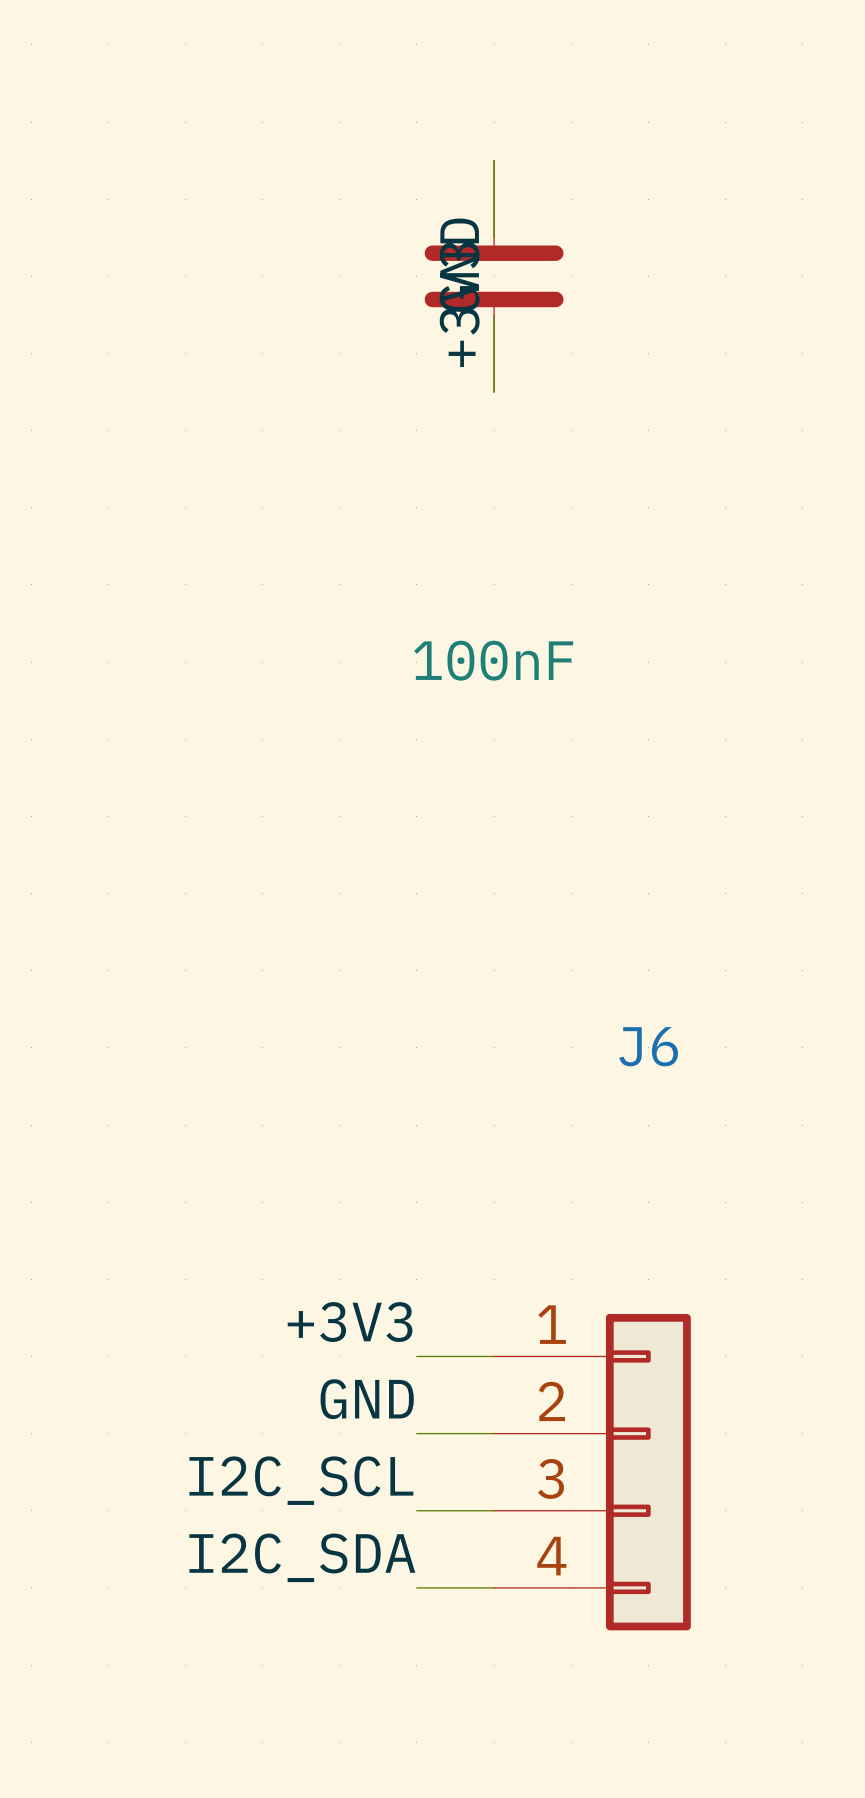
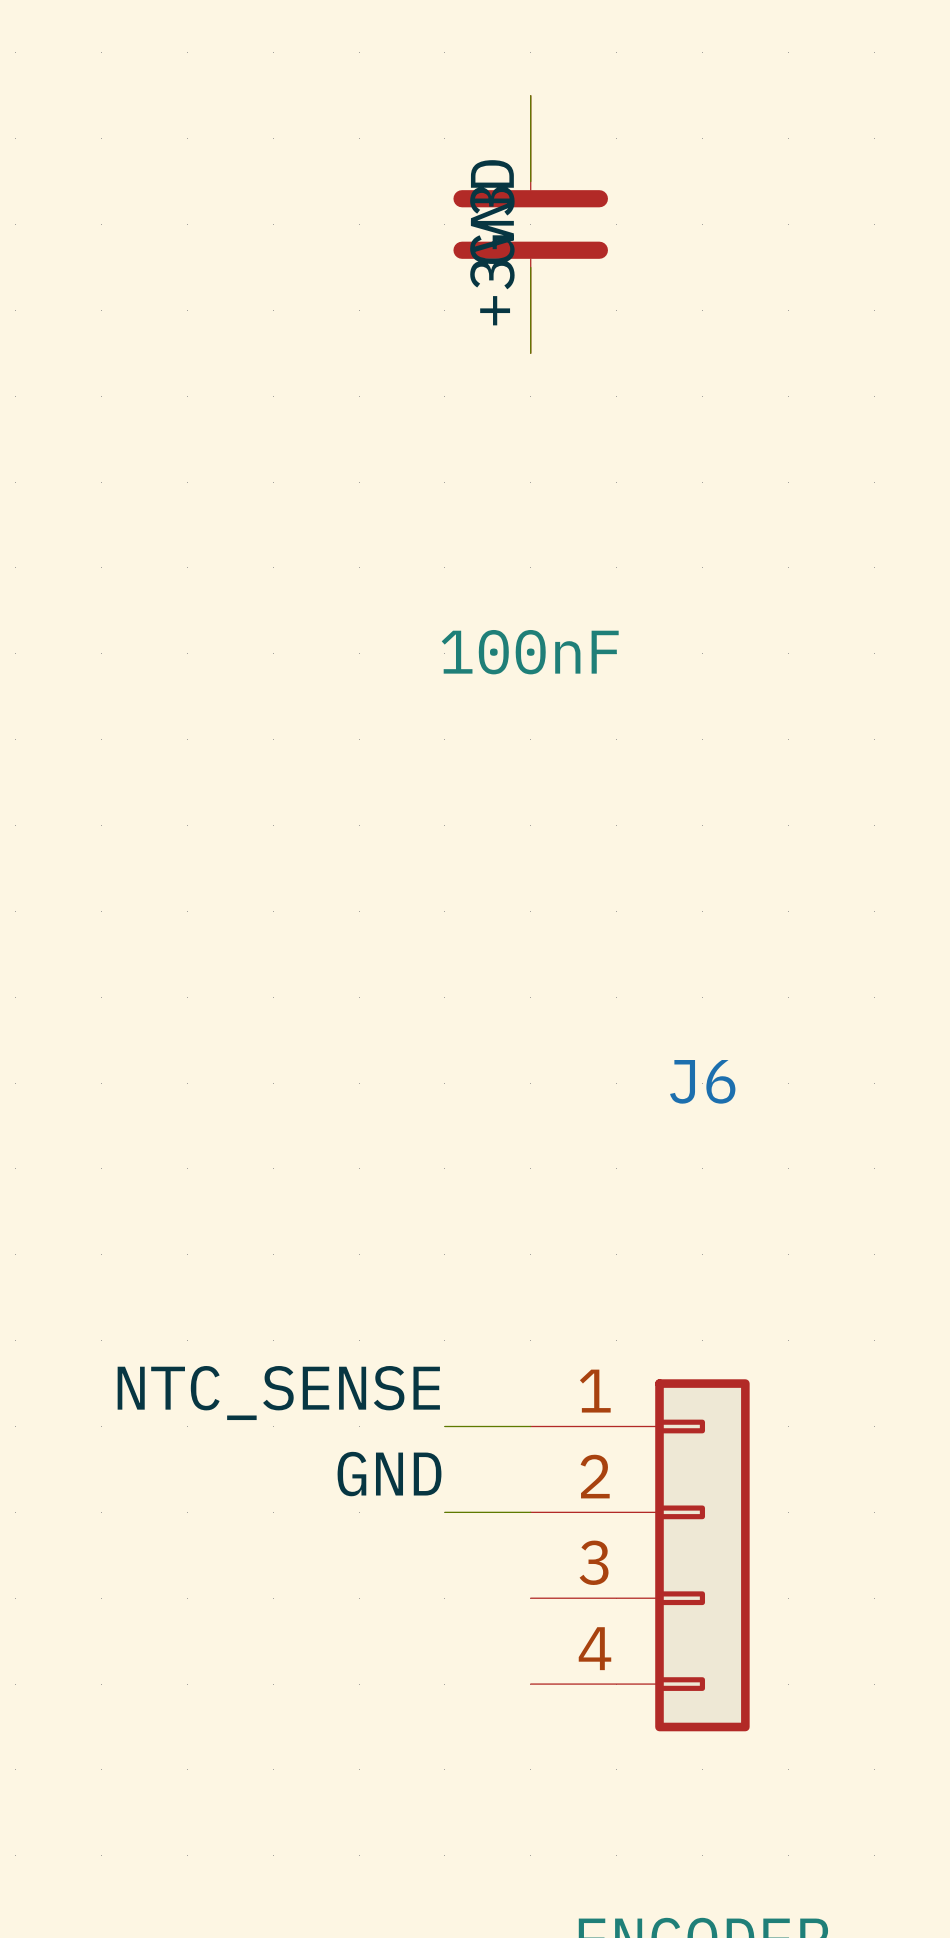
label: +3V3 (350, 1322) -> NTC_SENSE (278, 1393)
label: I2C_SCL (301, 1480) -> none
wire: (416, 1510) (494, 1510) -> none
label: I2C_SDA (302, 1557) -> none
wire: (416, 1587) (494, 1587) -> none

